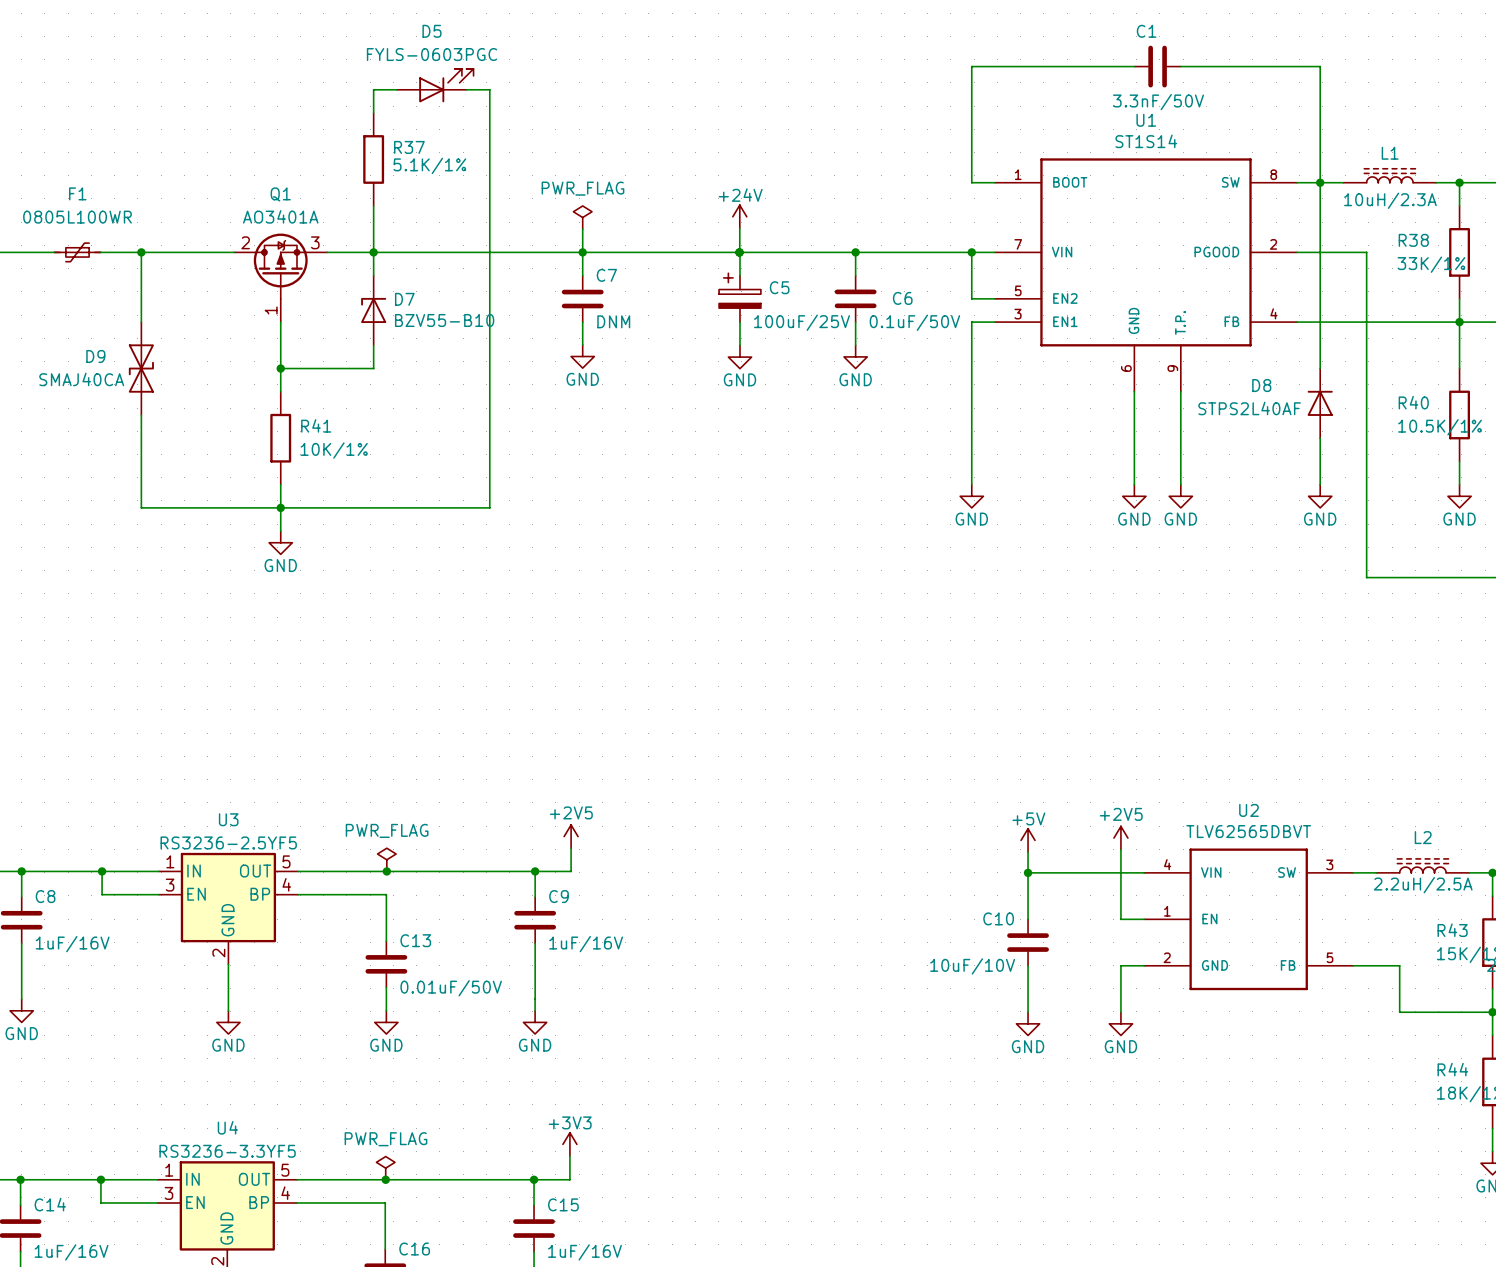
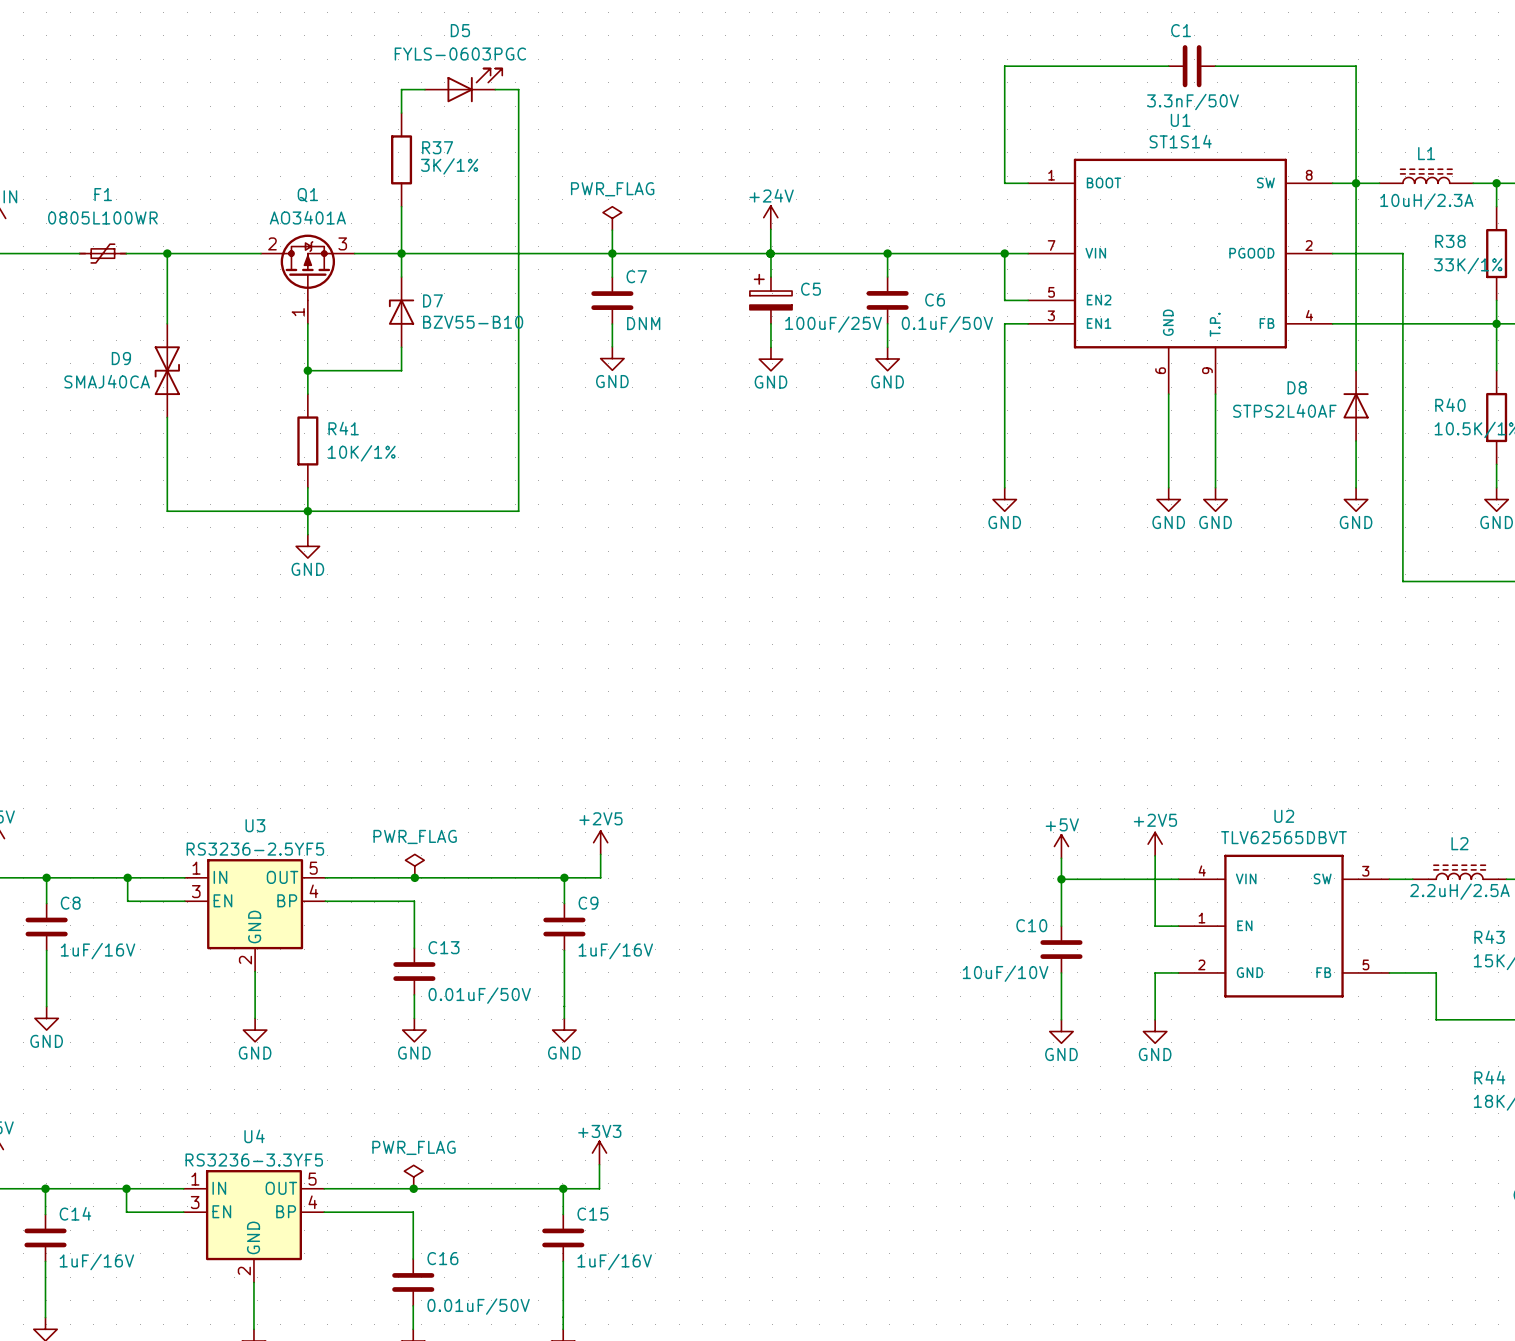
R37 value: 5.1K/1% (429, 165) -> 3K/1% (449, 166)

